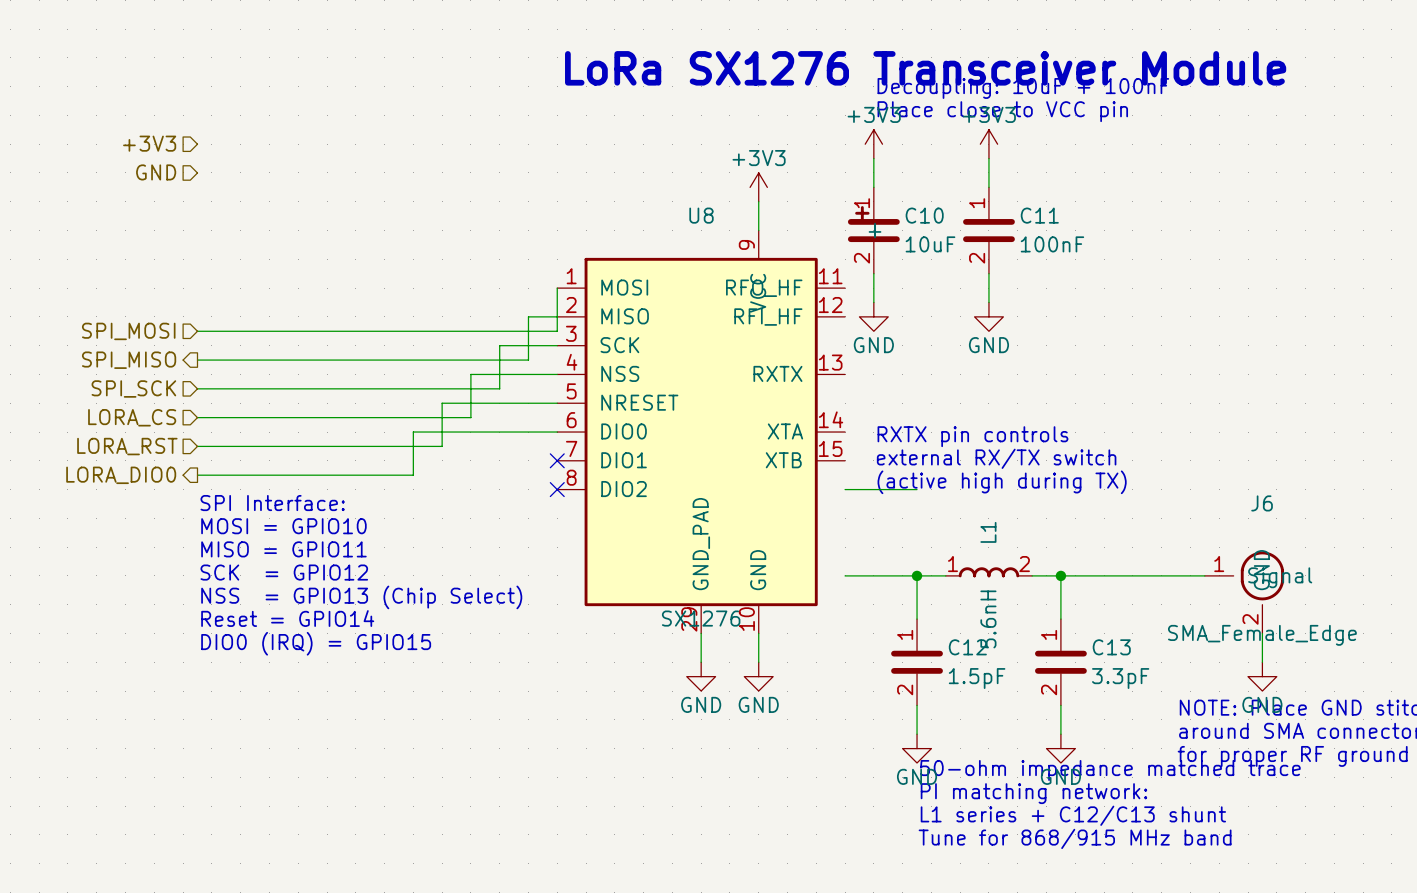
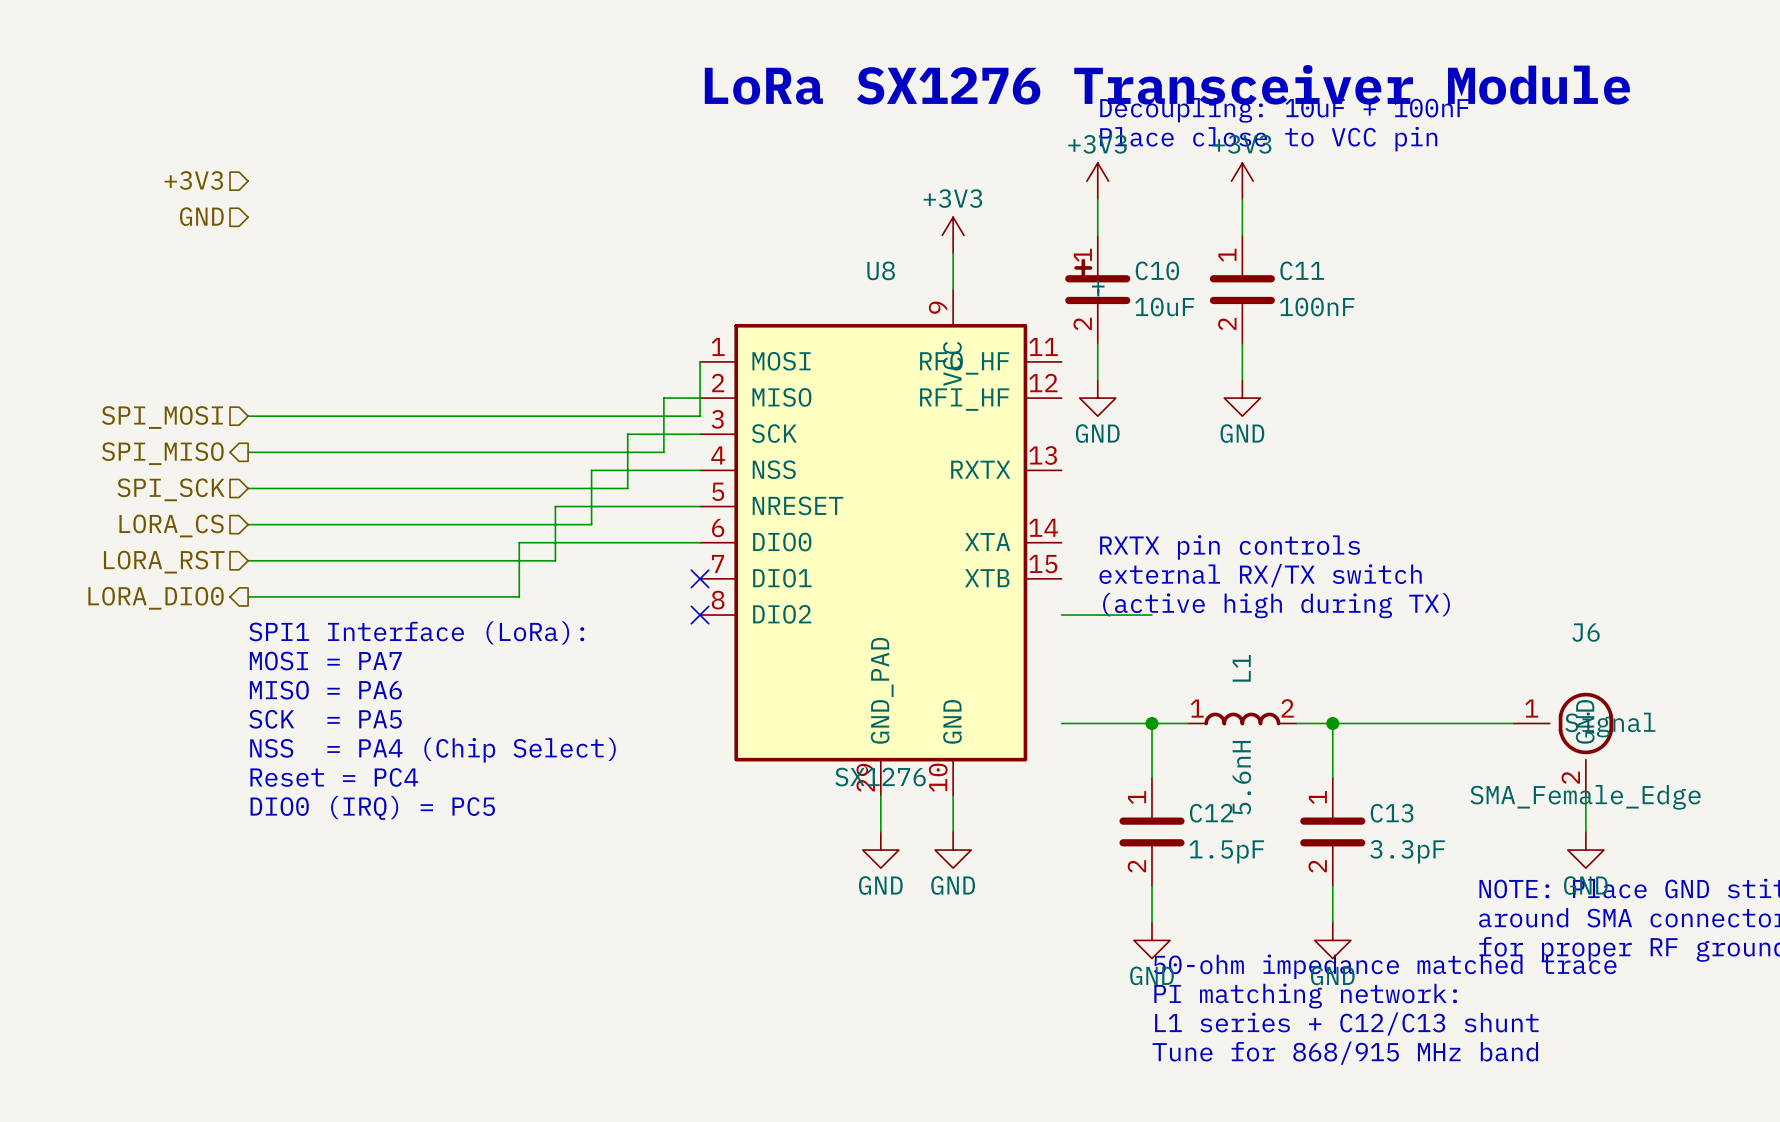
text: SPI Interface: (272, 503) -> SPI1 Interface (LoRa): (416, 632)
text: MOSI = GPIO10 (283, 526) -> MOSI = PA7 (325, 661)
text: MISO = GPIO11 (283, 549) -> MISO = PA6 (325, 690)
text: SCK = GPIO12 (284, 572) -> SCK = PA5 (325, 719)
text: NSS = GPIO13 (Chip Select) (361, 597) -> NSS = PA4 (Chip Select) (432, 750)
text: Reset = GPIO14 (287, 618) -> Reset = PC4 (334, 777)
text: DIO0 (IRQ) = GPIO15 (316, 643) -> DIO0 (IRQ) = PC5 (372, 807)

